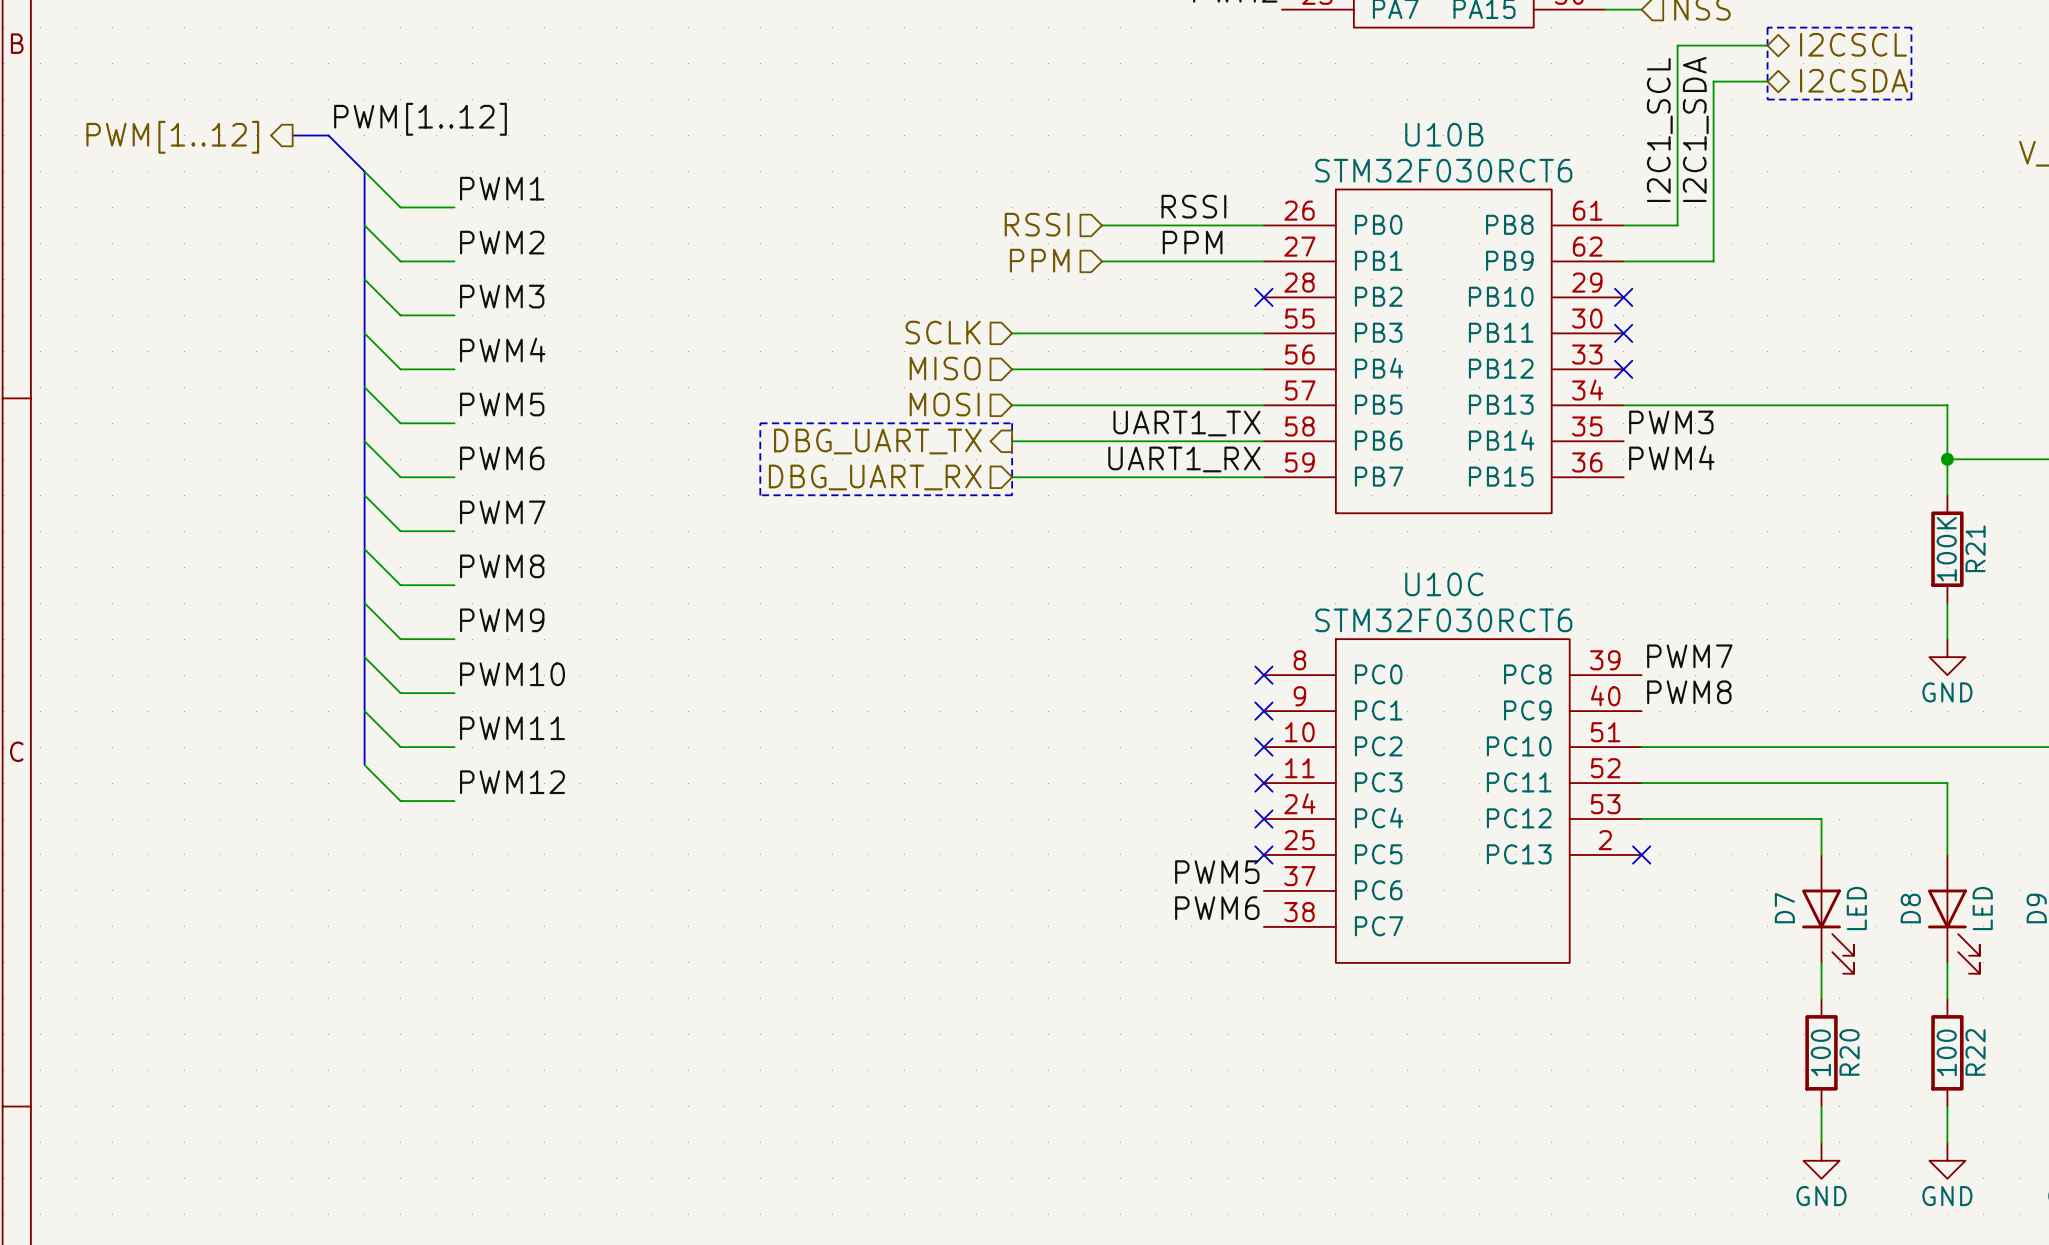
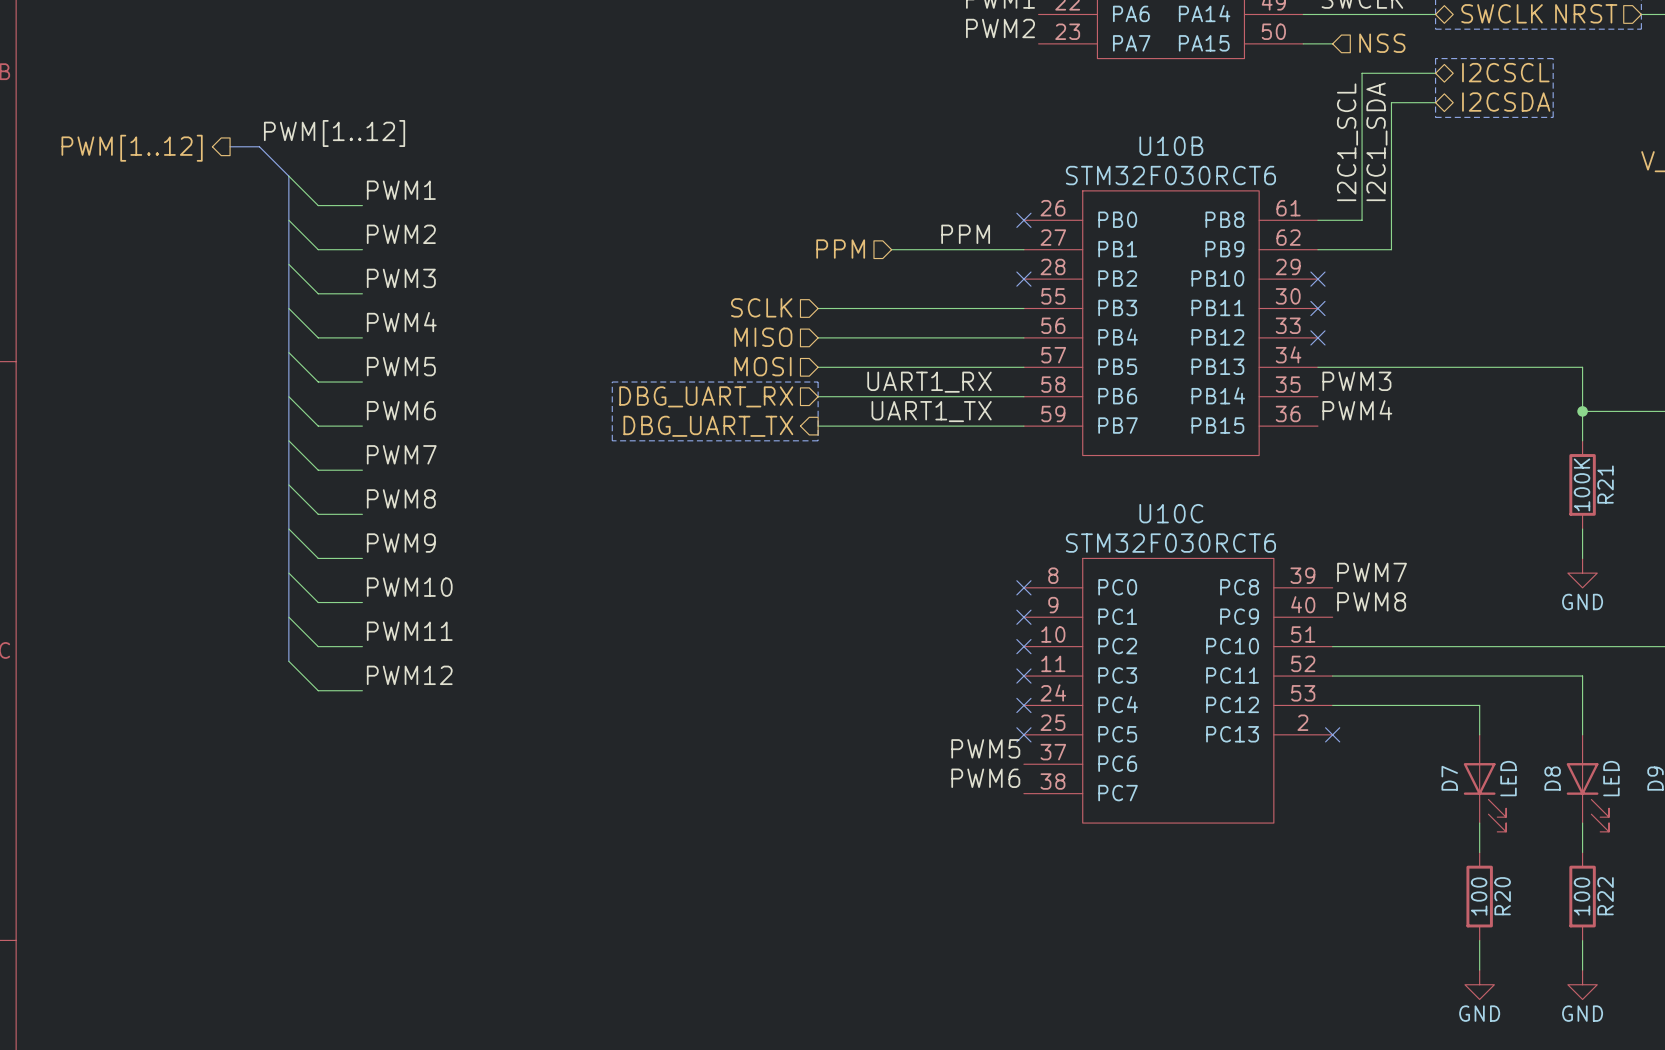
label: RSSI (1193, 206) -> none
hierarchical label: RSSI (1037, 224) -> none
wire: (1102, 225) (1263, 225) -> none
no-connect mark: none -> (1023, 220)
label position: UART1_TX (1186, 423) -> UART1_TX (931, 411)
hierarchical label shape: output (877, 441) -> input (706, 396)
hierarchical label: DBG_UART_TX (877, 441) -> DBG_UART_RX (706, 396)
label position: UART1_RX (1184, 459) -> UART1_RX (929, 382)
hierarchical label shape: input (875, 477) -> output (708, 426)
hierarchical label: DBG_UART_RX (875, 477) -> DBG_UART_TX (708, 426)

